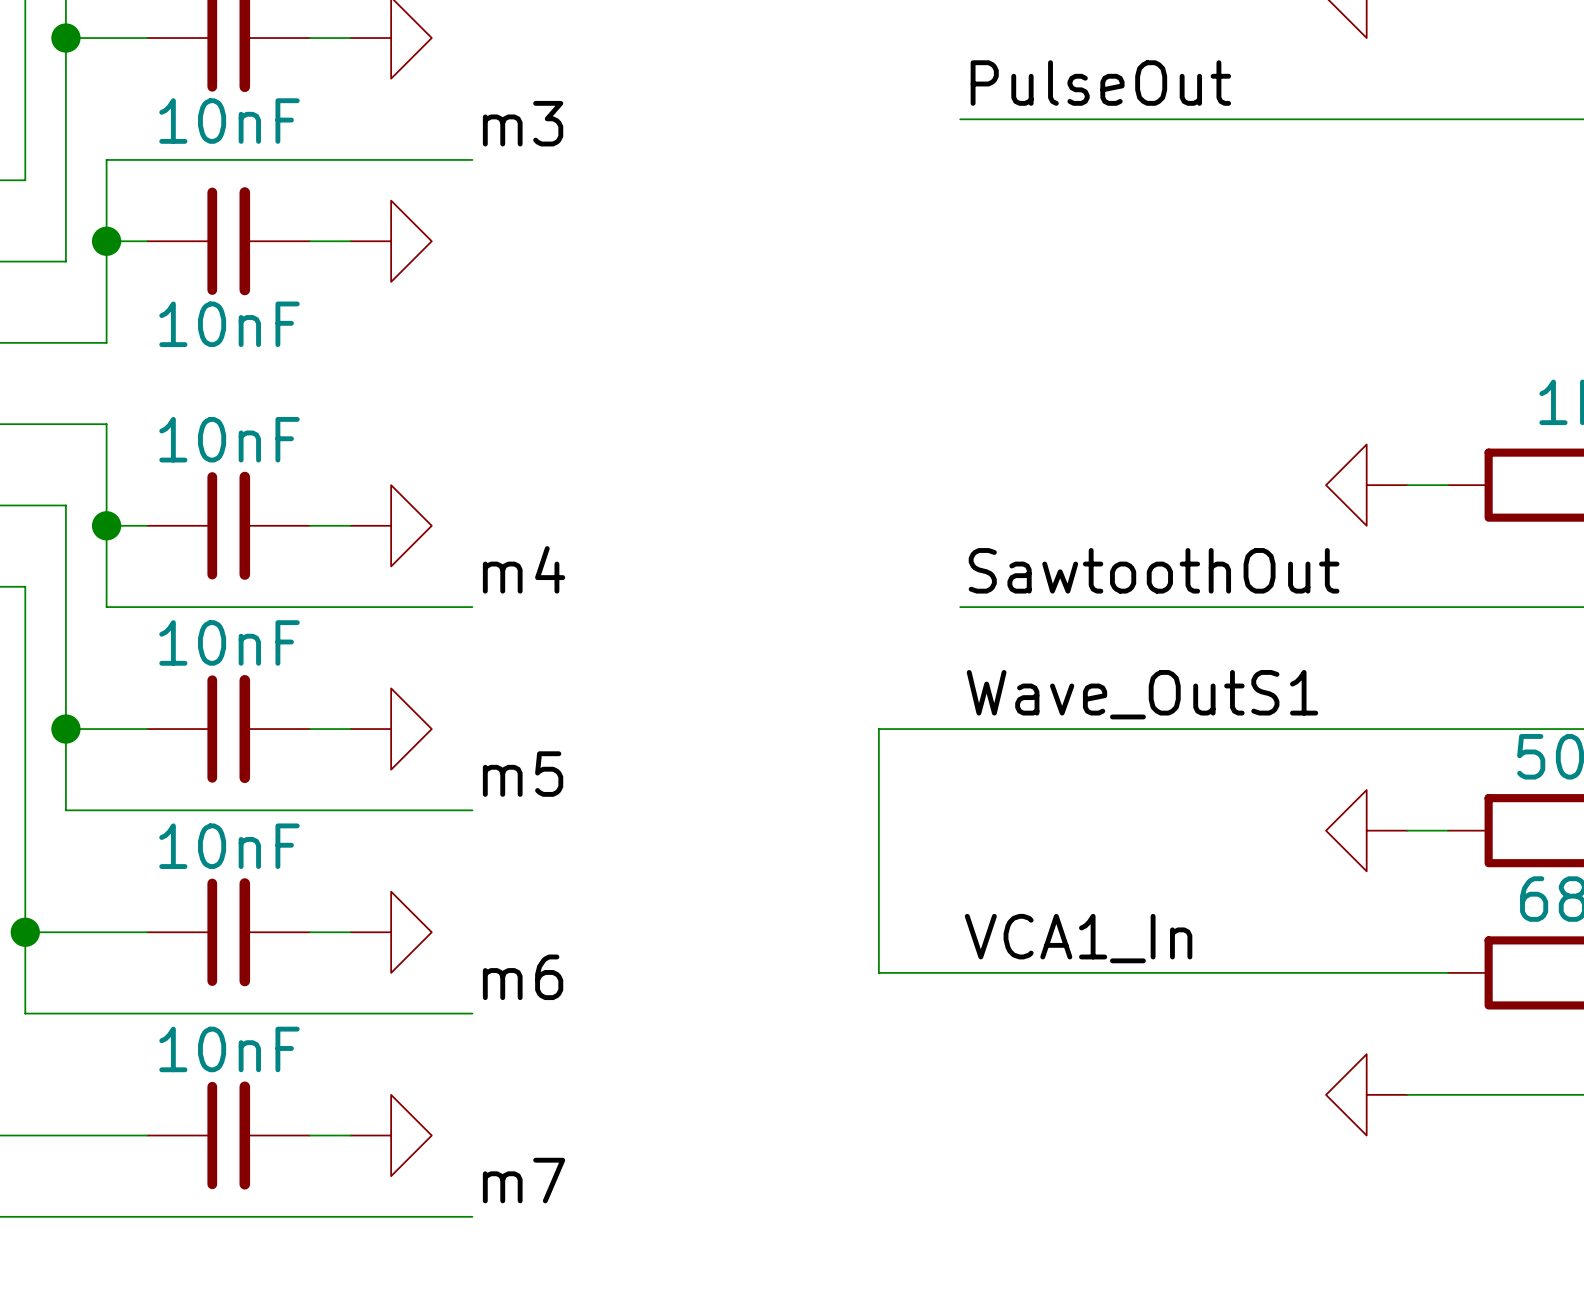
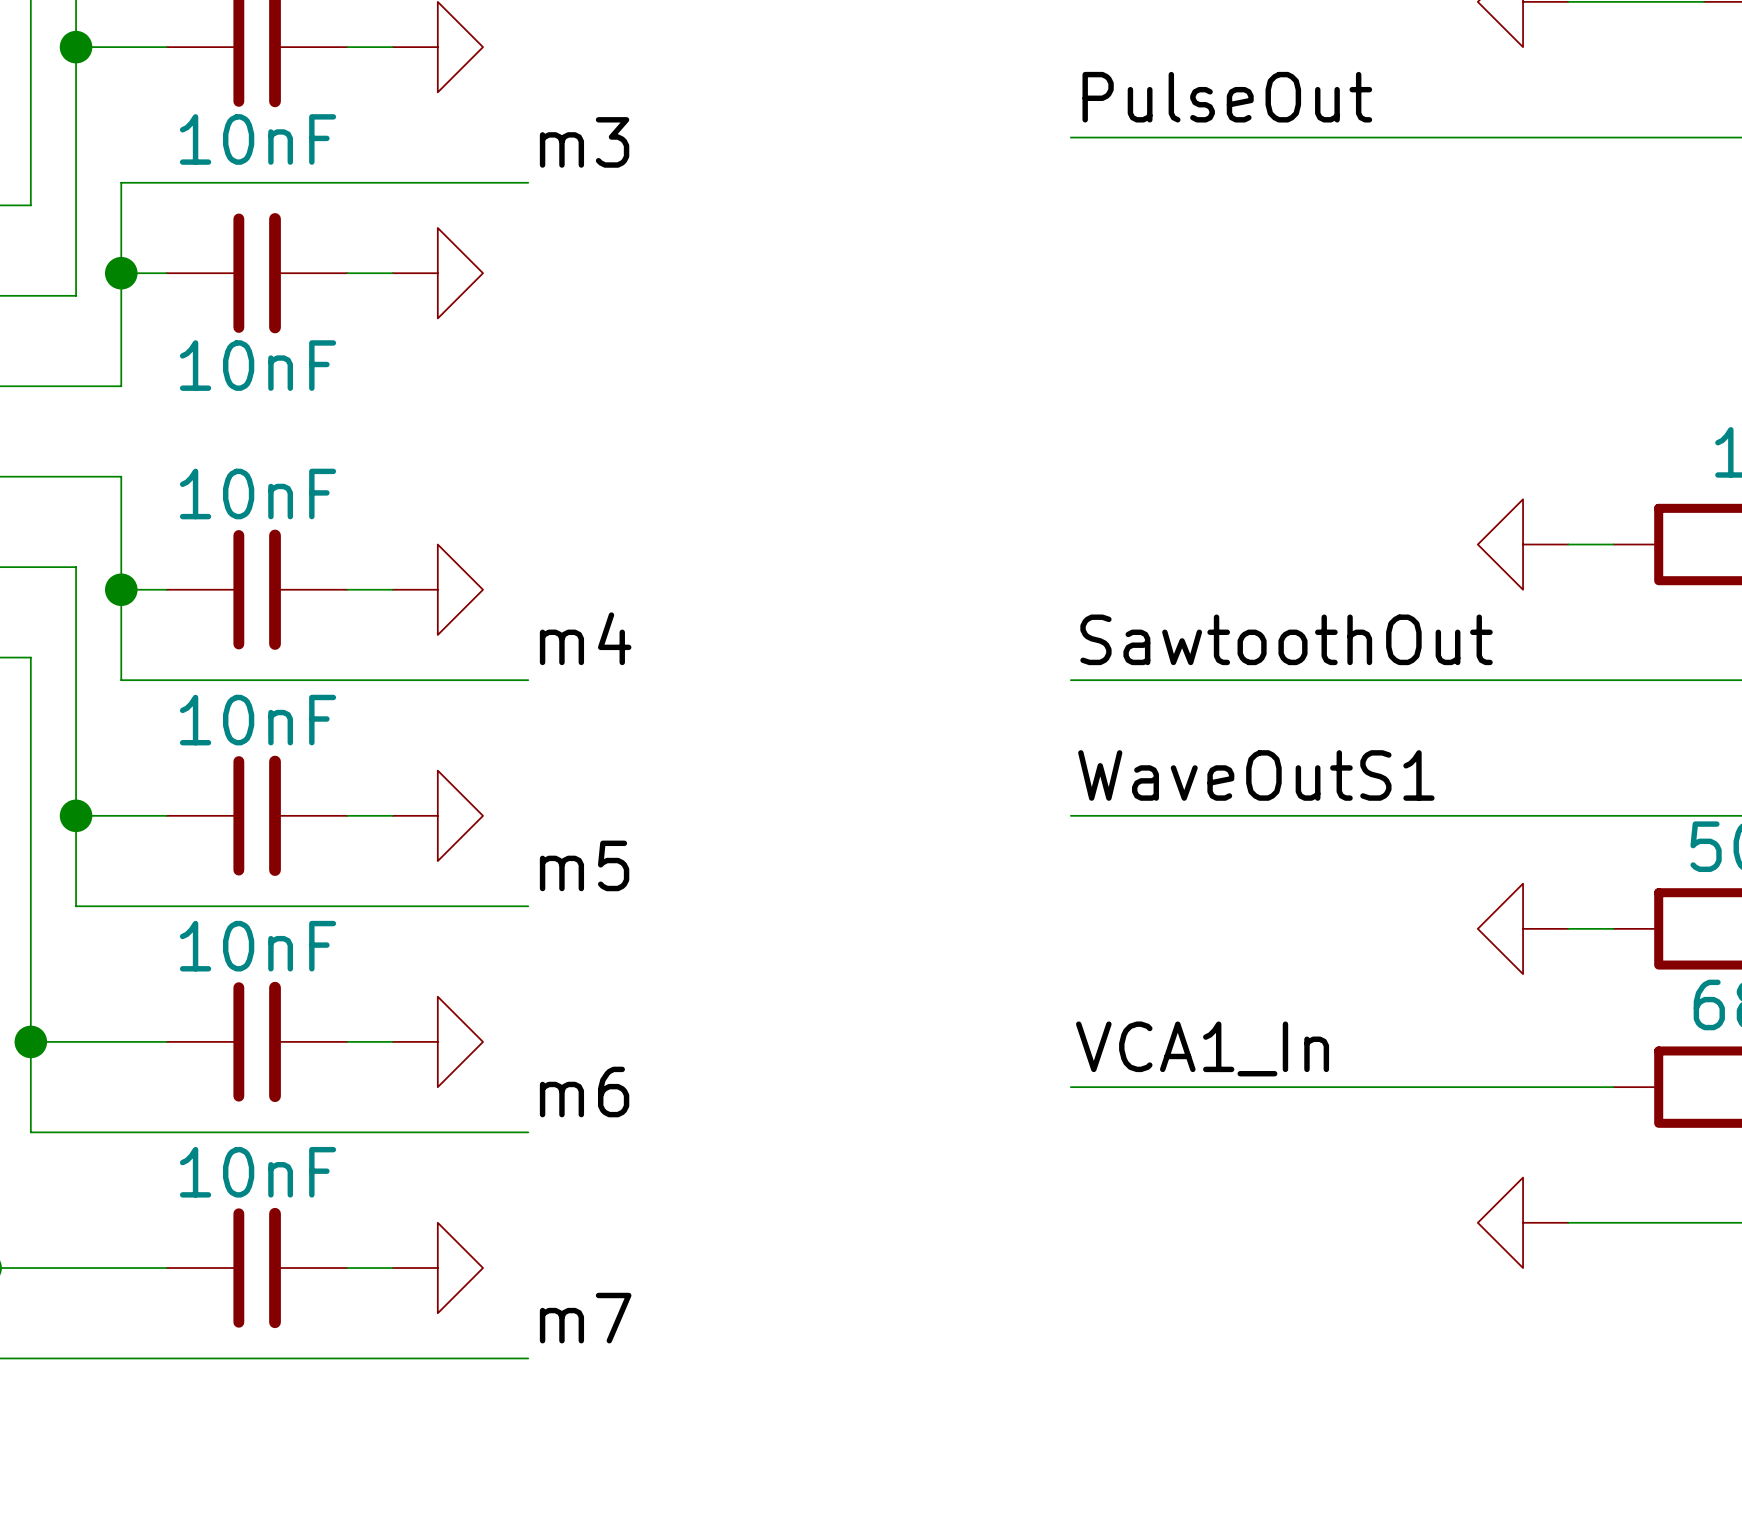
label: Wave_OutS1 (1142, 694) -> WaveOutS1 (1256, 775)
wire: (960, 729) (878, 729) (878, 972) (960, 972) -> none

